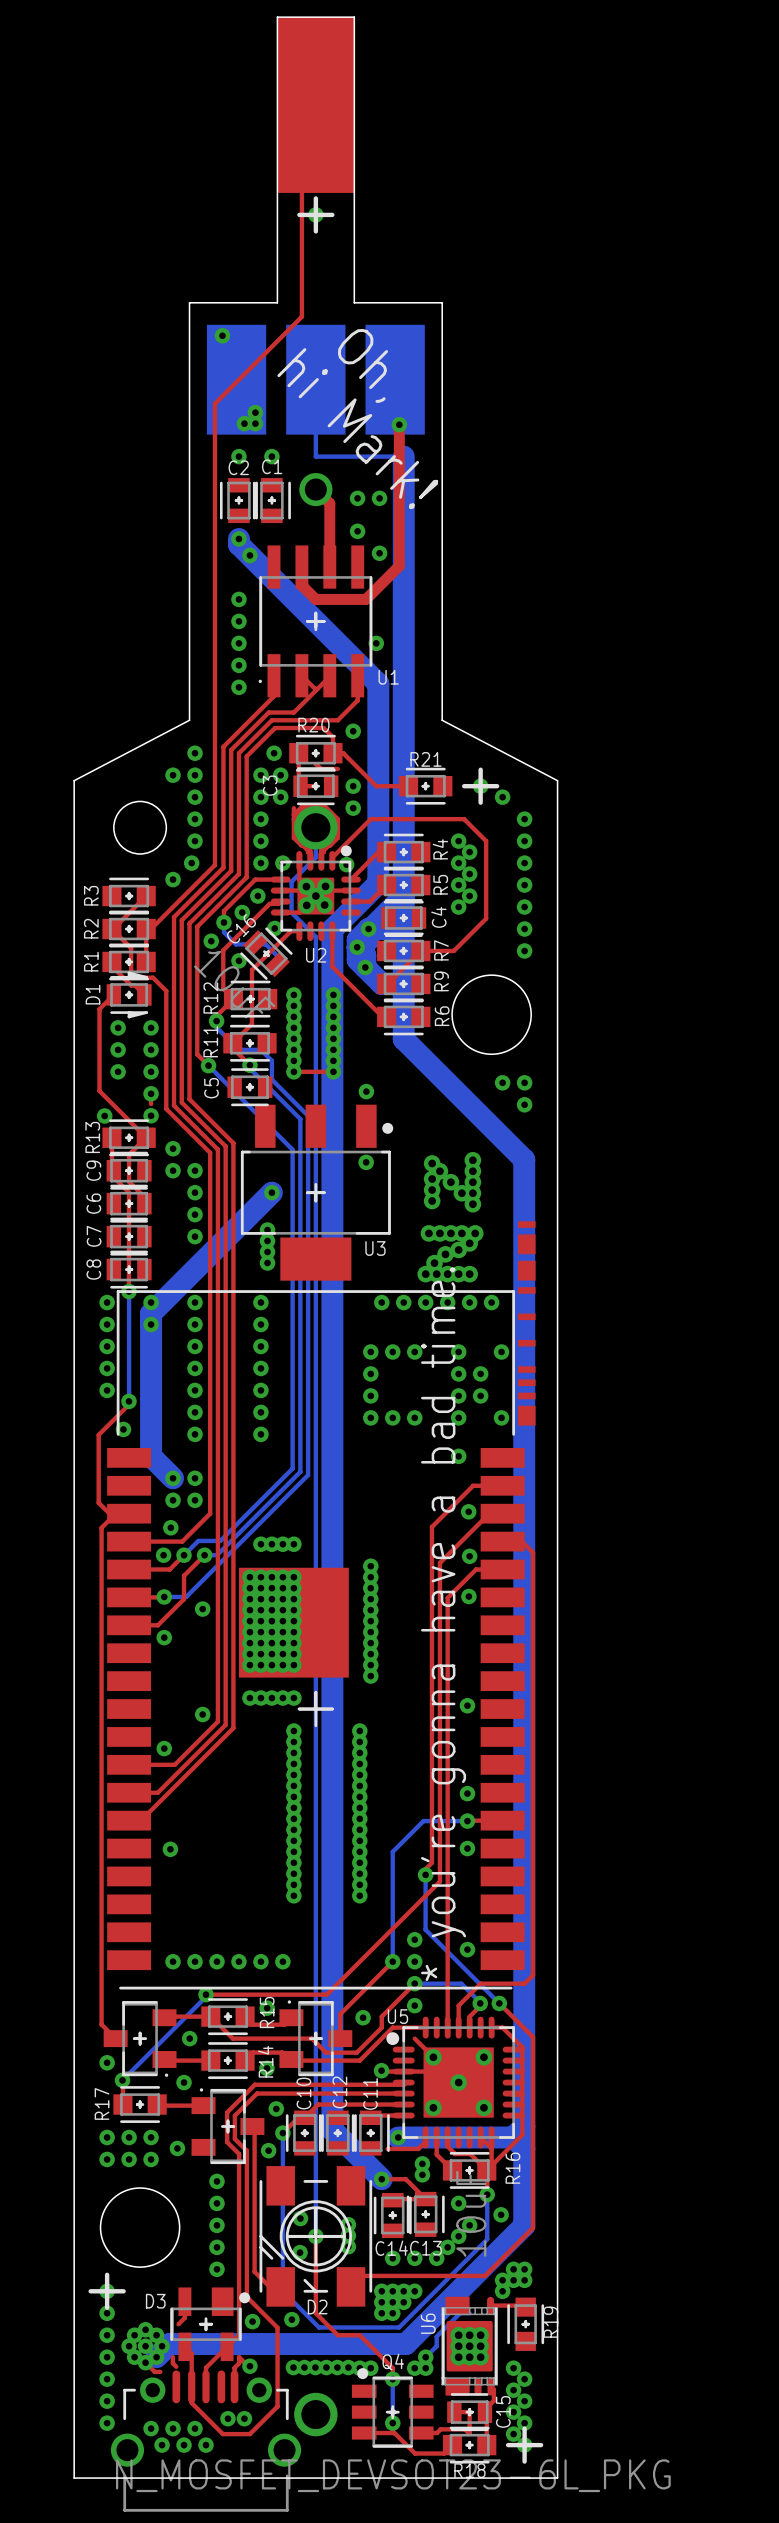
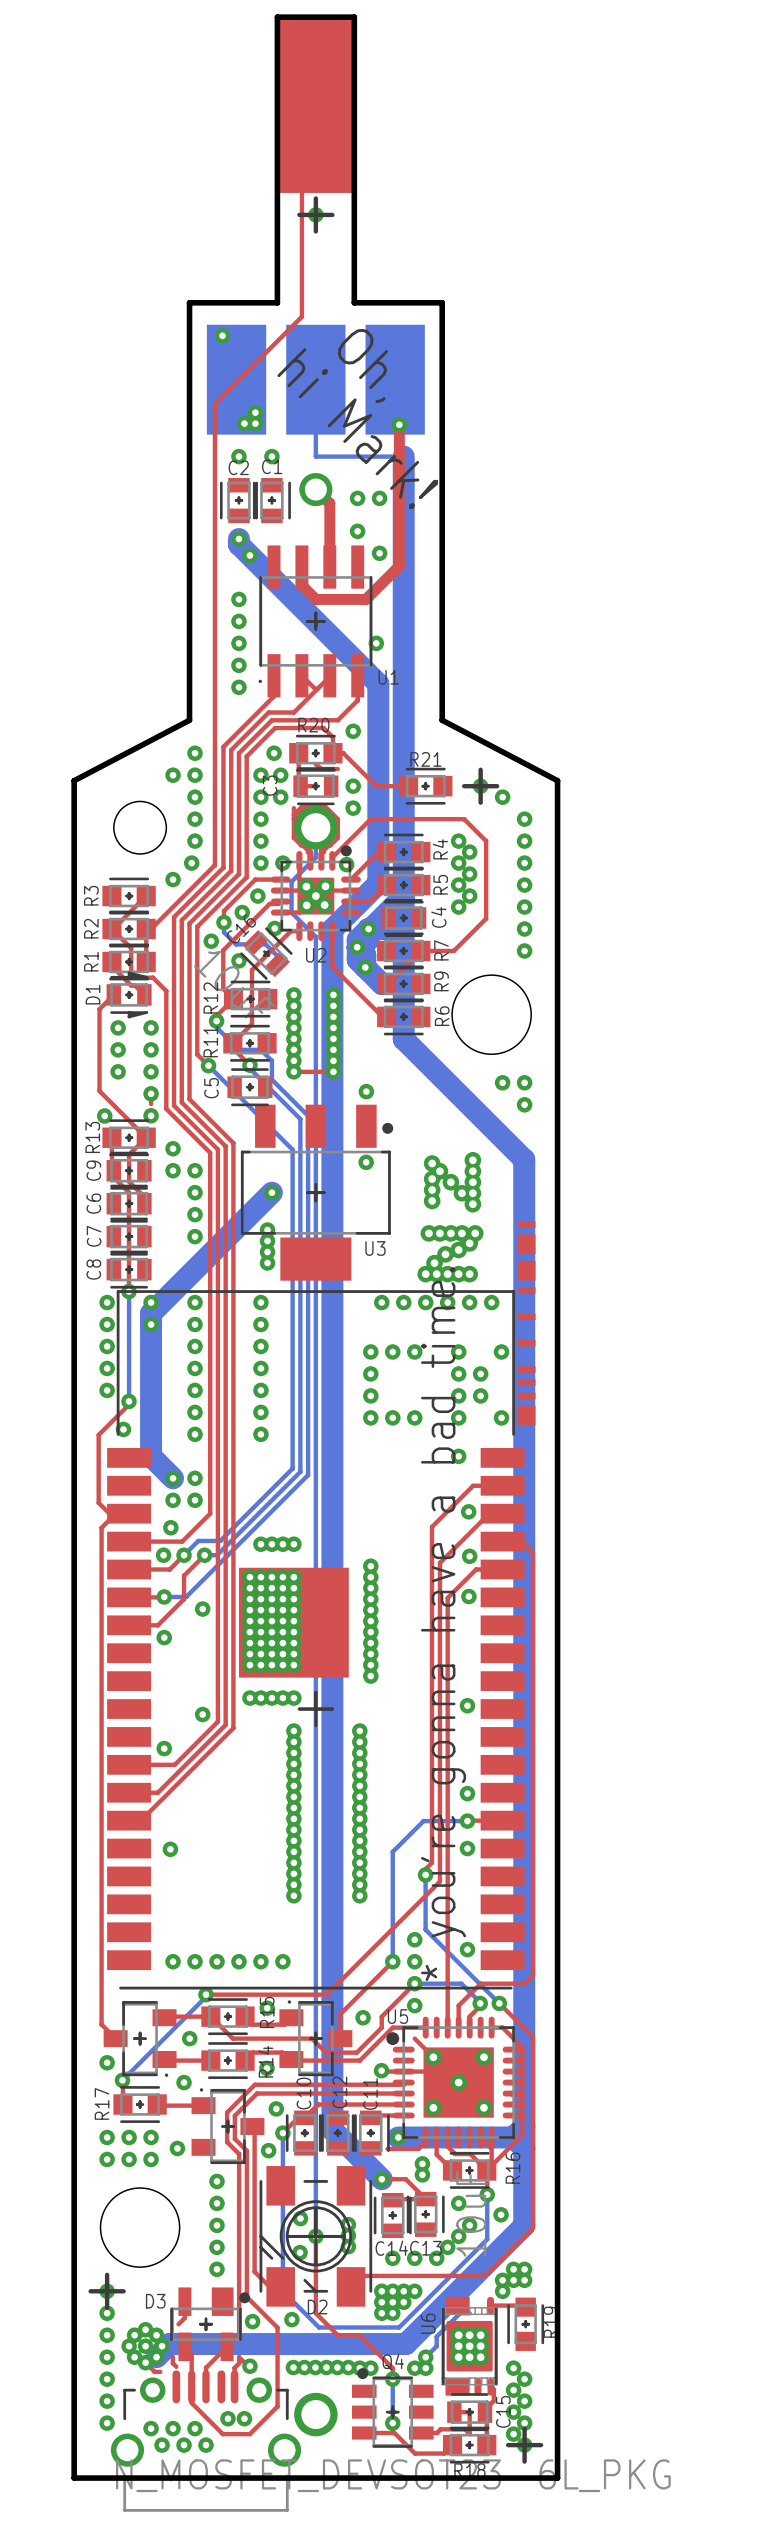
board edge width: thin (277, 17) (354, 17) (354, 302) (442, 302) (442, 720) (557, 780) (557, 2478) (74, 2478) (74, 780) (189, 720) (189, 302) (277, 302) (277, 17) -> thick (277, 17) (354, 17) (354, 302) (442, 302) (442, 720) (557, 780) (557, 2478) (74, 2478) (74, 780) (189, 720) (189, 302) (277, 302) (277, 17)

